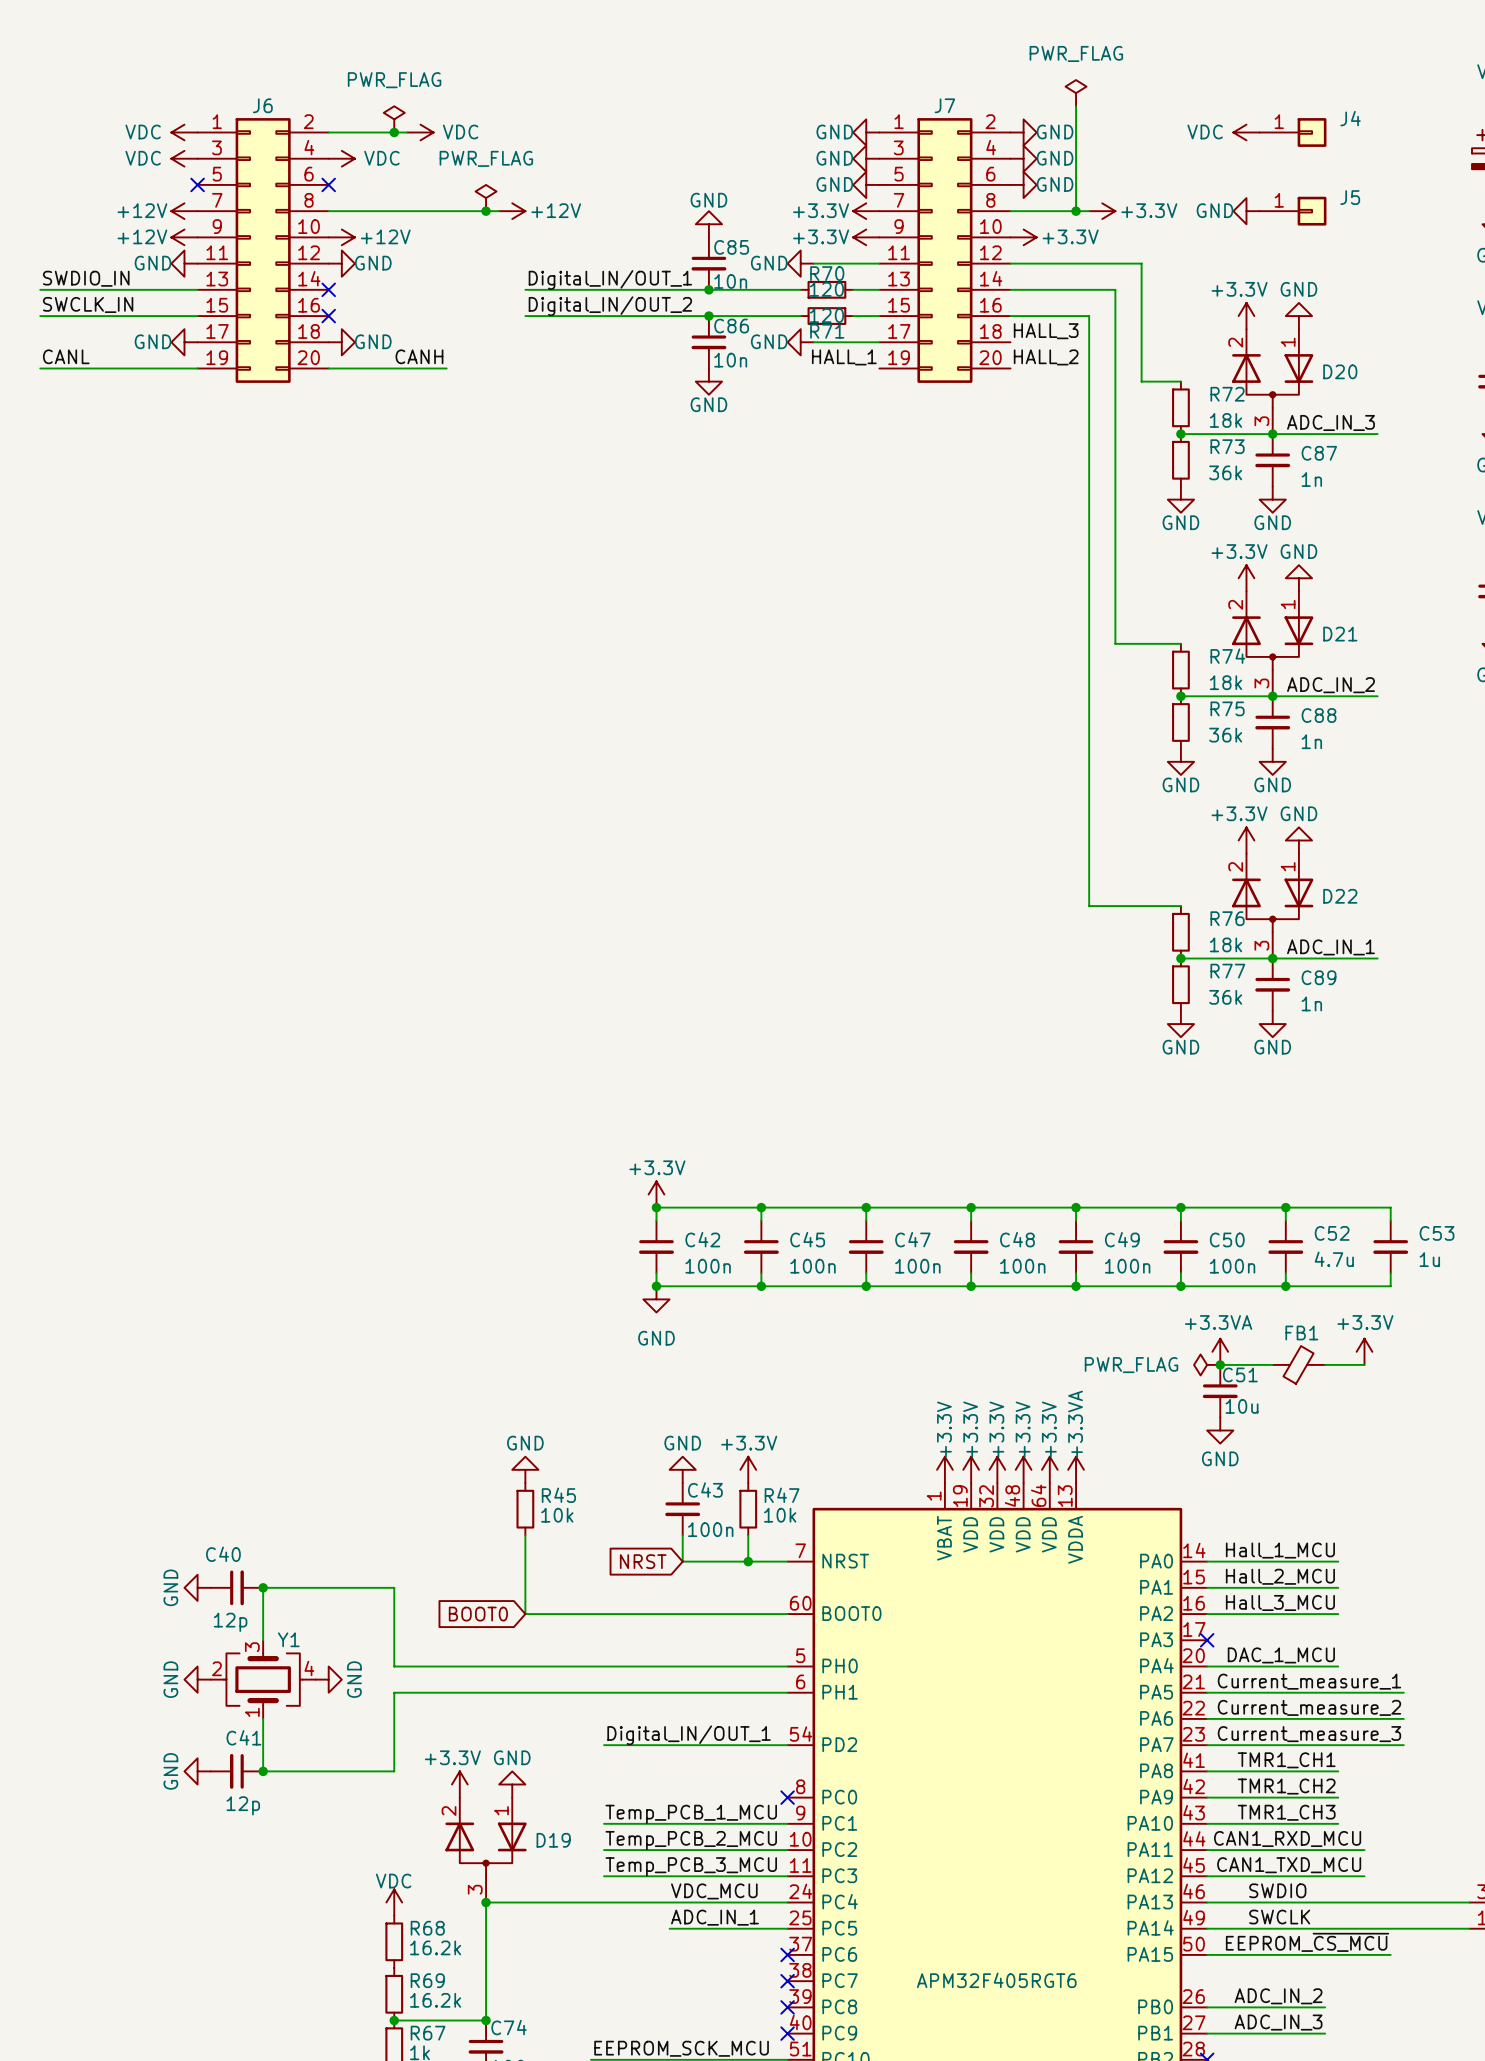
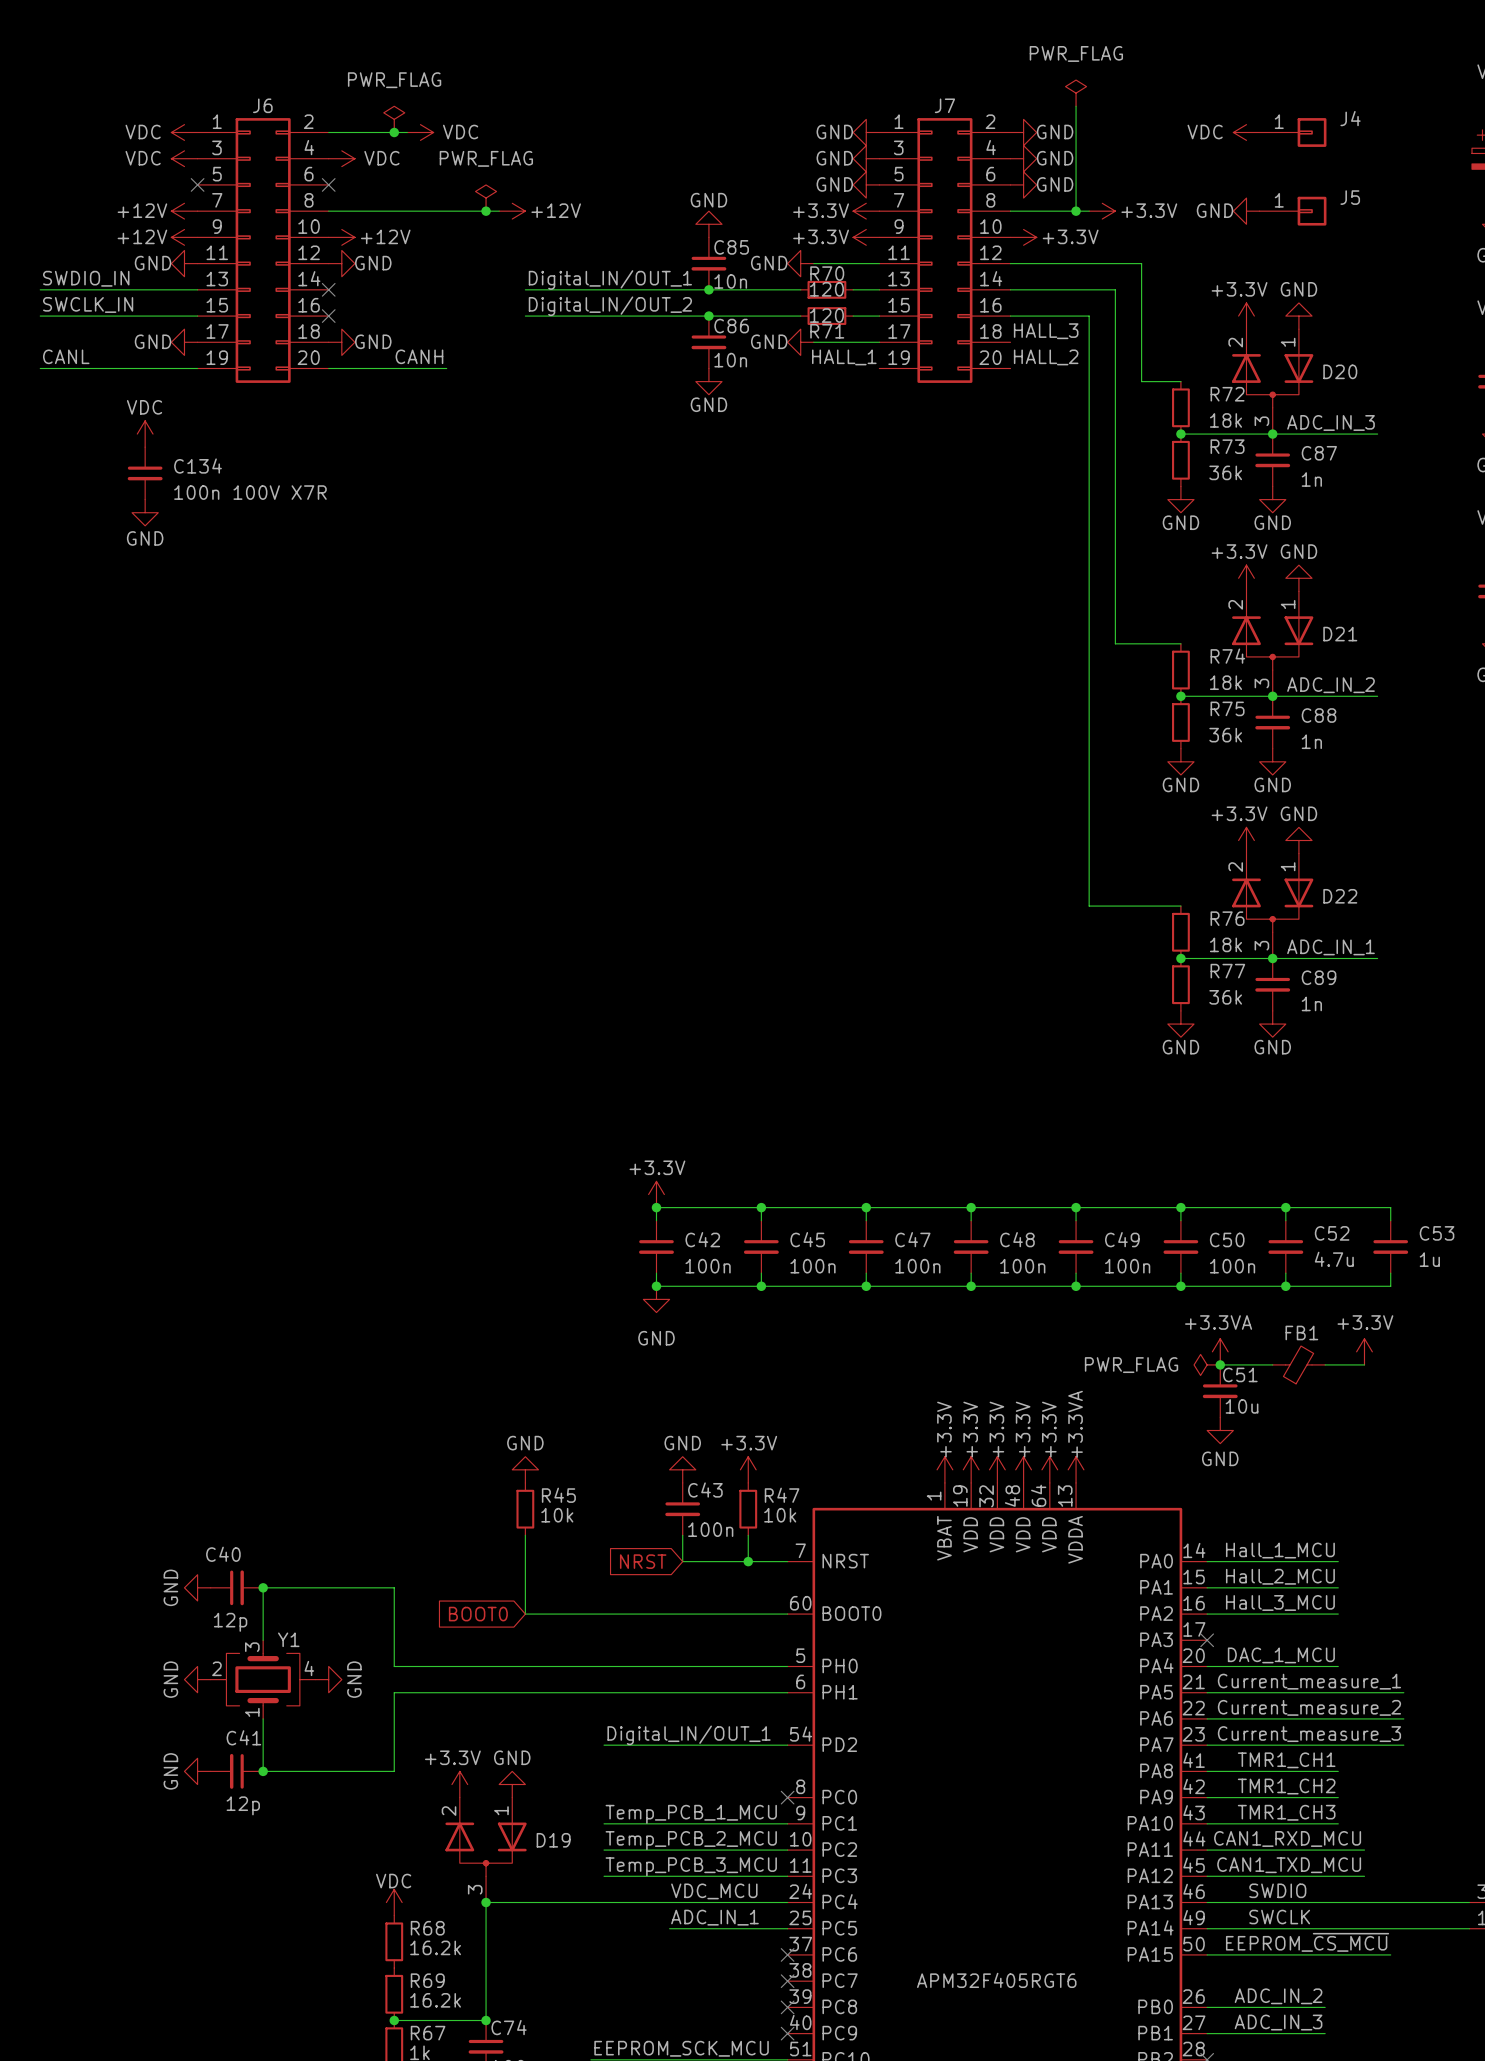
power symbol: none -> VDC (145, 434)
C134: none -> 100n 100V X7R (145, 473)
power symbol: none -> GND (145, 512)

